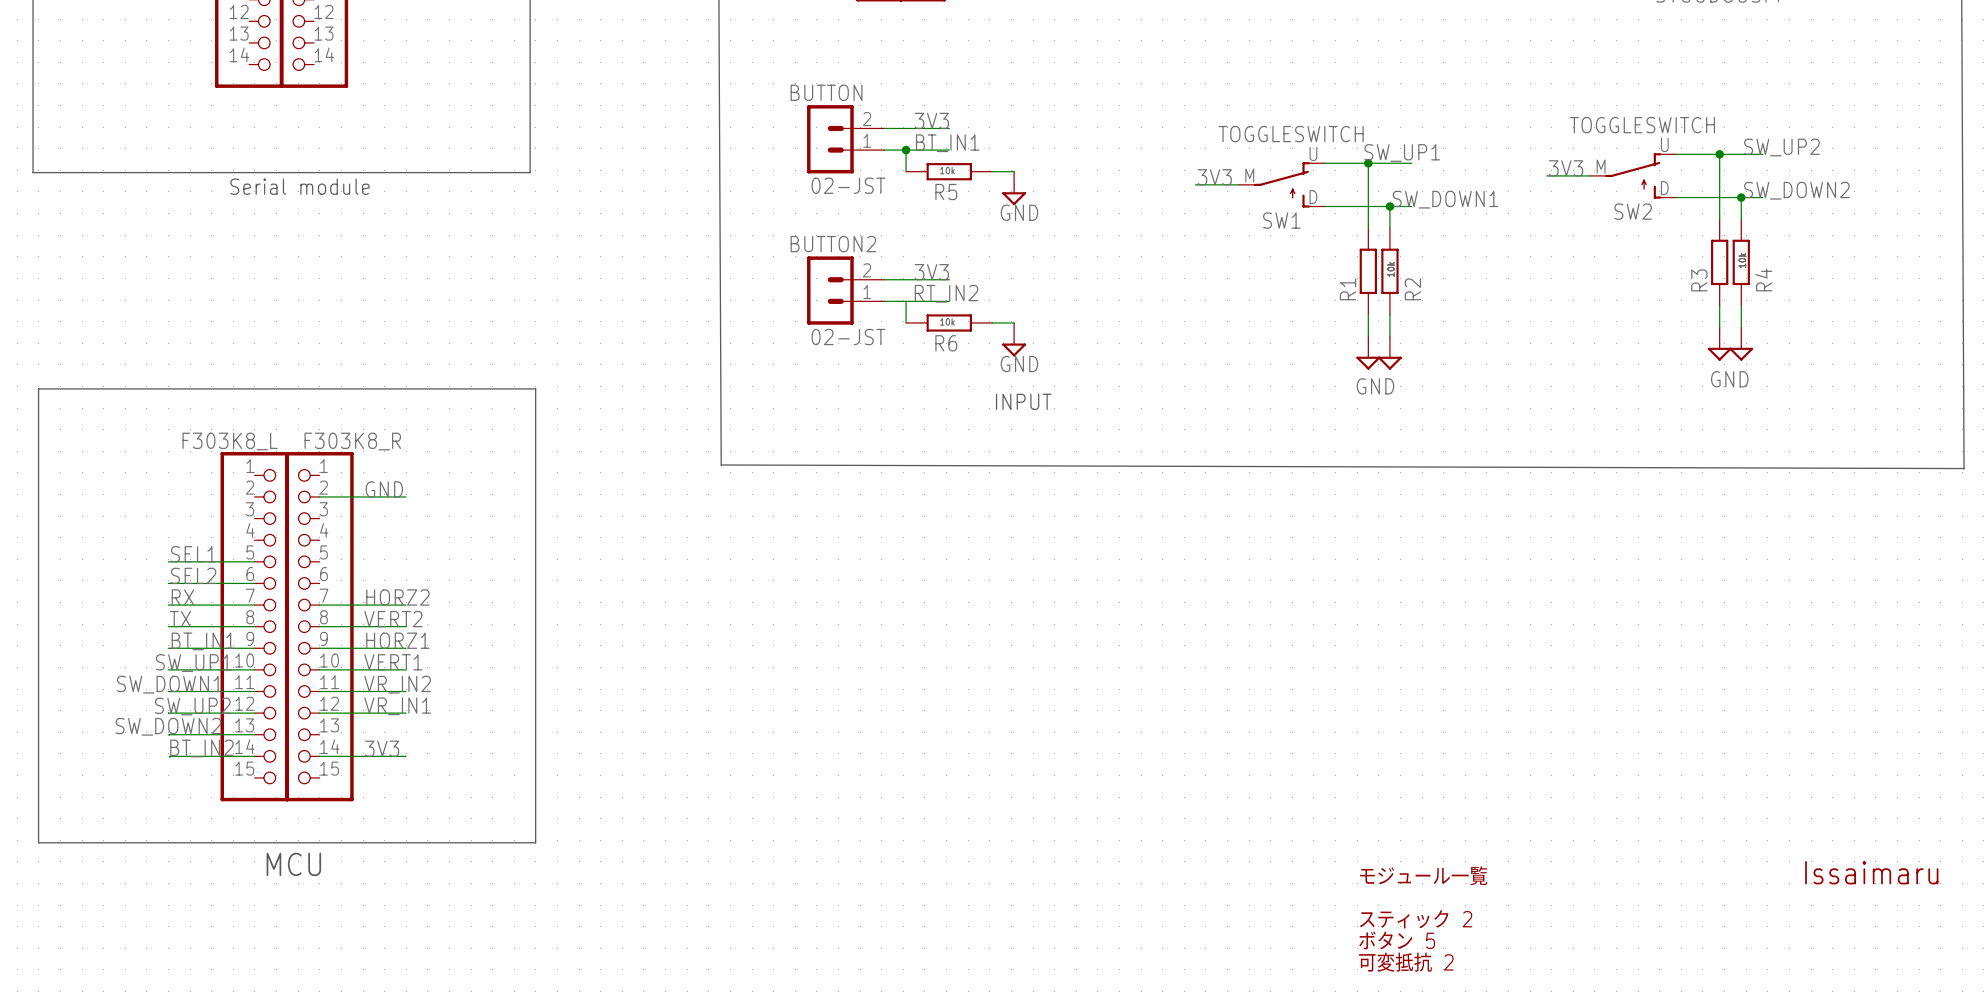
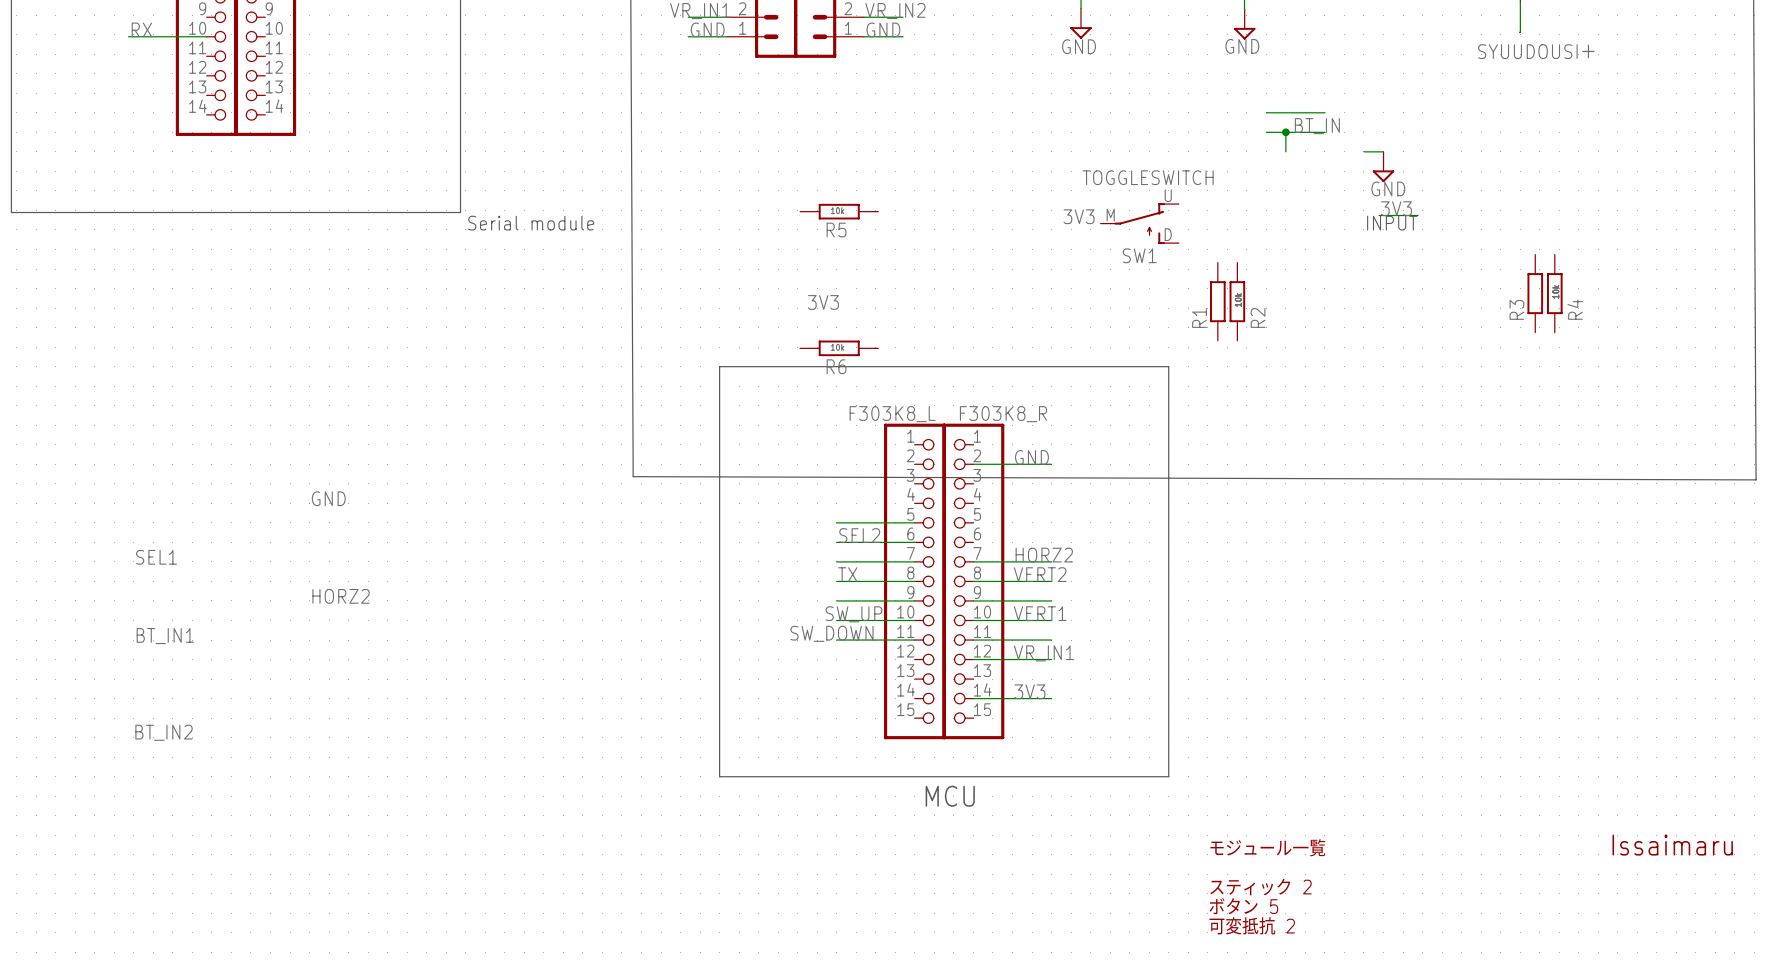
wire: none -> (1266, 112) (1324, 112)
label: none -> BT_IN (1317, 126)
wire: none -> (1266, 132) (1324, 132)
junction: none -> (1285, 132)
wire: none -> (1363, 151) (1383, 151)
label: 3V3 (931, 120) -> none
power symbol: none -> GND (1383, 166)
wire: (884, 128) (949, 128) -> none
BUTTON: 02-JST (845, 139) -> none
label: BT_IN1 (947, 143) -> none
label: SW_UP2 (1781, 147) -> none
wire: (884, 150) (949, 150) -> none
wire: (906, 150) (906, 171) -> none
junction: (906, 150) -> none
label: SW_UP1 (1402, 153) -> none
wire: (1676, 154) (1762, 154) -> none
wire: (1719, 154) (1719, 219) -> none
junction: (1719, 154) -> none
wire: (1325, 163) (1411, 163) -> none
wire: (1368, 163) (1368, 228) -> none
junction: (1368, 163) -> none
wire: (992, 171) (1014, 171) -> none
SW2: TOGGLESWITCH (1633, 175) -> none
text: none -> Serial module (531, 223)
wire: (1195, 184) (1238, 184) -> none
text: none -> INPUT (1392, 223)
text: Serial module (299, 186) -> none
power symbol: GND (1014, 188) -> none
label: SW_DOWN2 (1796, 190) -> none
wire: (1676, 197) (1762, 197) -> none
wire: (1741, 197) (1741, 219) -> none
junction: (1741, 197) -> none
label: SW_DOWN1 (1445, 199) -> none
wire: (1325, 206) (1411, 206) -> none
wire: (1389, 206) (1389, 228) -> (1285, 132) (1285, 151)
junction: (1389, 206) -> none
wire: (884, 279) (949, 279) -> none
BUTTON2: 02-JST (845, 290) -> none
label: RT_IN2 (946, 293) -> none
wire: (884, 301) (949, 301) -> none
wire: (906, 301) (906, 322) -> none
wire: (1719, 305) (1719, 327) -> none
wire: (1741, 305) (1741, 327) -> none
wire: (1368, 314) (1368, 336) -> none
wire: (1389, 314) (1389, 336) -> none
wire: (992, 322) (1014, 322) -> none
power symbol: GND (1014, 339) -> none
line: none -> (719, 366) (719, 776) (1168, 776) (1168, 366) (719, 366)
power symbol: GND (1719, 343) -> none
power symbol: (1741, 343) -> none
power symbol: GND (1368, 352) -> none
power symbol: (1389, 352) -> none
line: (38, 388) (38, 842) (535, 842) (535, 388) (38, 388) -> none
text: INPUT (1023, 401) -> none
label: none -> GND (1031, 457)
wire: none -> (973, 464) (1051, 464)
wire: (319, 496) (405, 496) -> none
wire: none -> (836, 522) (914, 522)
label: none -> SEL2 (859, 535)
wire: none -> (836, 542) (914, 542)
label: none -> HORZ2 (1044, 555)
wire: none -> (836, 561) (914, 561)
wire: none -> (973, 561) (1051, 561)
wire: (168, 561) (254, 561) -> none
label: none -> TX (847, 574)
label: none -> VERT2 (1040, 574)
label: SEL2 (193, 575) -> none
wire: none -> (836, 581) (914, 581)
wire: none -> (973, 581) (1051, 581)
wire: (168, 583) (254, 583) -> none
label: RX (182, 597) -> none
wire: none -> (836, 600) (914, 600)
wire: none -> (973, 600) (1051, 600)
wire: (168, 605) (254, 605) -> none
wire: (319, 605) (405, 605) -> none
label: none -> VERT1 (1040, 613)
label: none -> SW_UP (853, 614)
label: TX (180, 619) -> none
label: VERT2 (393, 619) -> none
wire: none -> (836, 620) (914, 620)
wire: none -> (973, 620) (1051, 620)
wire: (168, 626) (254, 626) -> none
F303K8_L position: (254, 626) -> (914, 581)
wire: (319, 626) (405, 626) -> none
F303K8_R position: (319, 626) -> (973, 581)
label: none -> SW_DOWN (832, 633)
label: HORZ1 (397, 640) -> none
wire: none -> (836, 640) (914, 640)
wire: none -> (973, 640) (1051, 640)
wire: (168, 648) (254, 648) -> none
wire: (319, 648) (405, 648) -> none
label: none -> VR_IN1 (1043, 653)
label: VERT1 (393, 662) -> none
label: SW_UP1 (193, 663) -> none
wire: none -> (973, 659) (1051, 659)
wire: (168, 669) (254, 669) -> none
wire: (319, 669) (405, 669) -> none
label: SW_DOWN1 (169, 684) -> none
label: VR_IN2 (397, 684) -> none
wire: (168, 691) (254, 691) -> none
wire: (319, 691) (405, 691) -> none
label: none -> 3V3 (1029, 691)
label: SW_UP2 (192, 706) -> none
label: VR_IN1 (397, 706) -> none
wire: none -> (973, 698) (1051, 698)
wire: (254, 713) (168, 713) -> none
wire: (319, 713) (405, 713) -> none
label: SW_DOWN2 (168, 726) -> none
wire: (254, 734) (169, 735) -> none
label: 3V3 (382, 748) -> none
wire: (254, 756) (169, 757) -> none
wire: (319, 756) (405, 756) -> none
text: none -> MCU (950, 796)
text: MCU (293, 864) -> none

